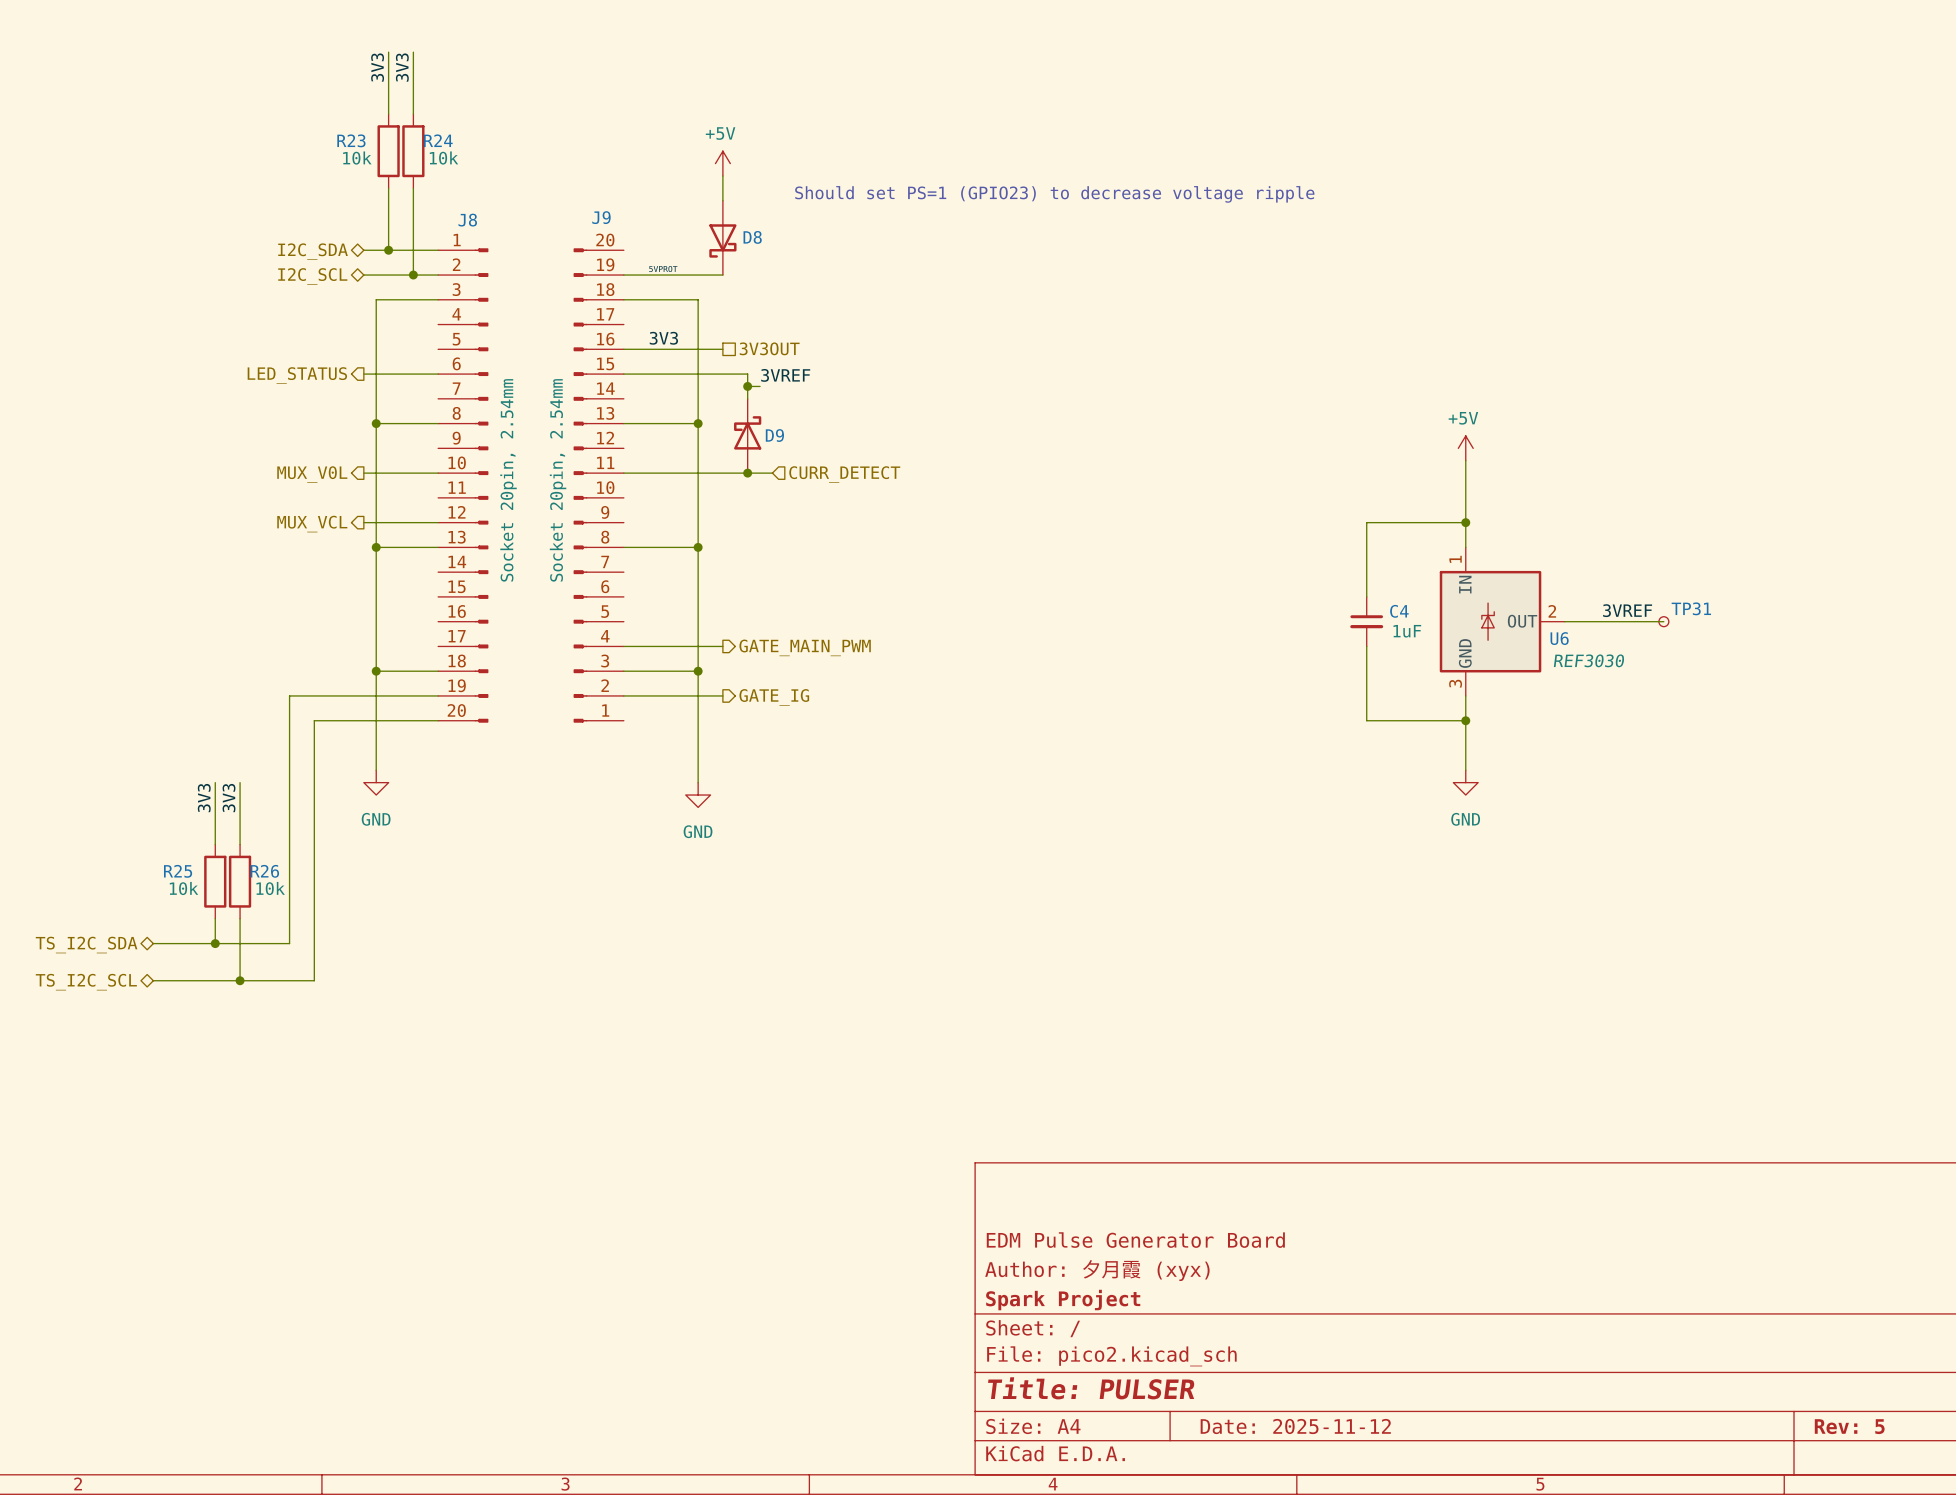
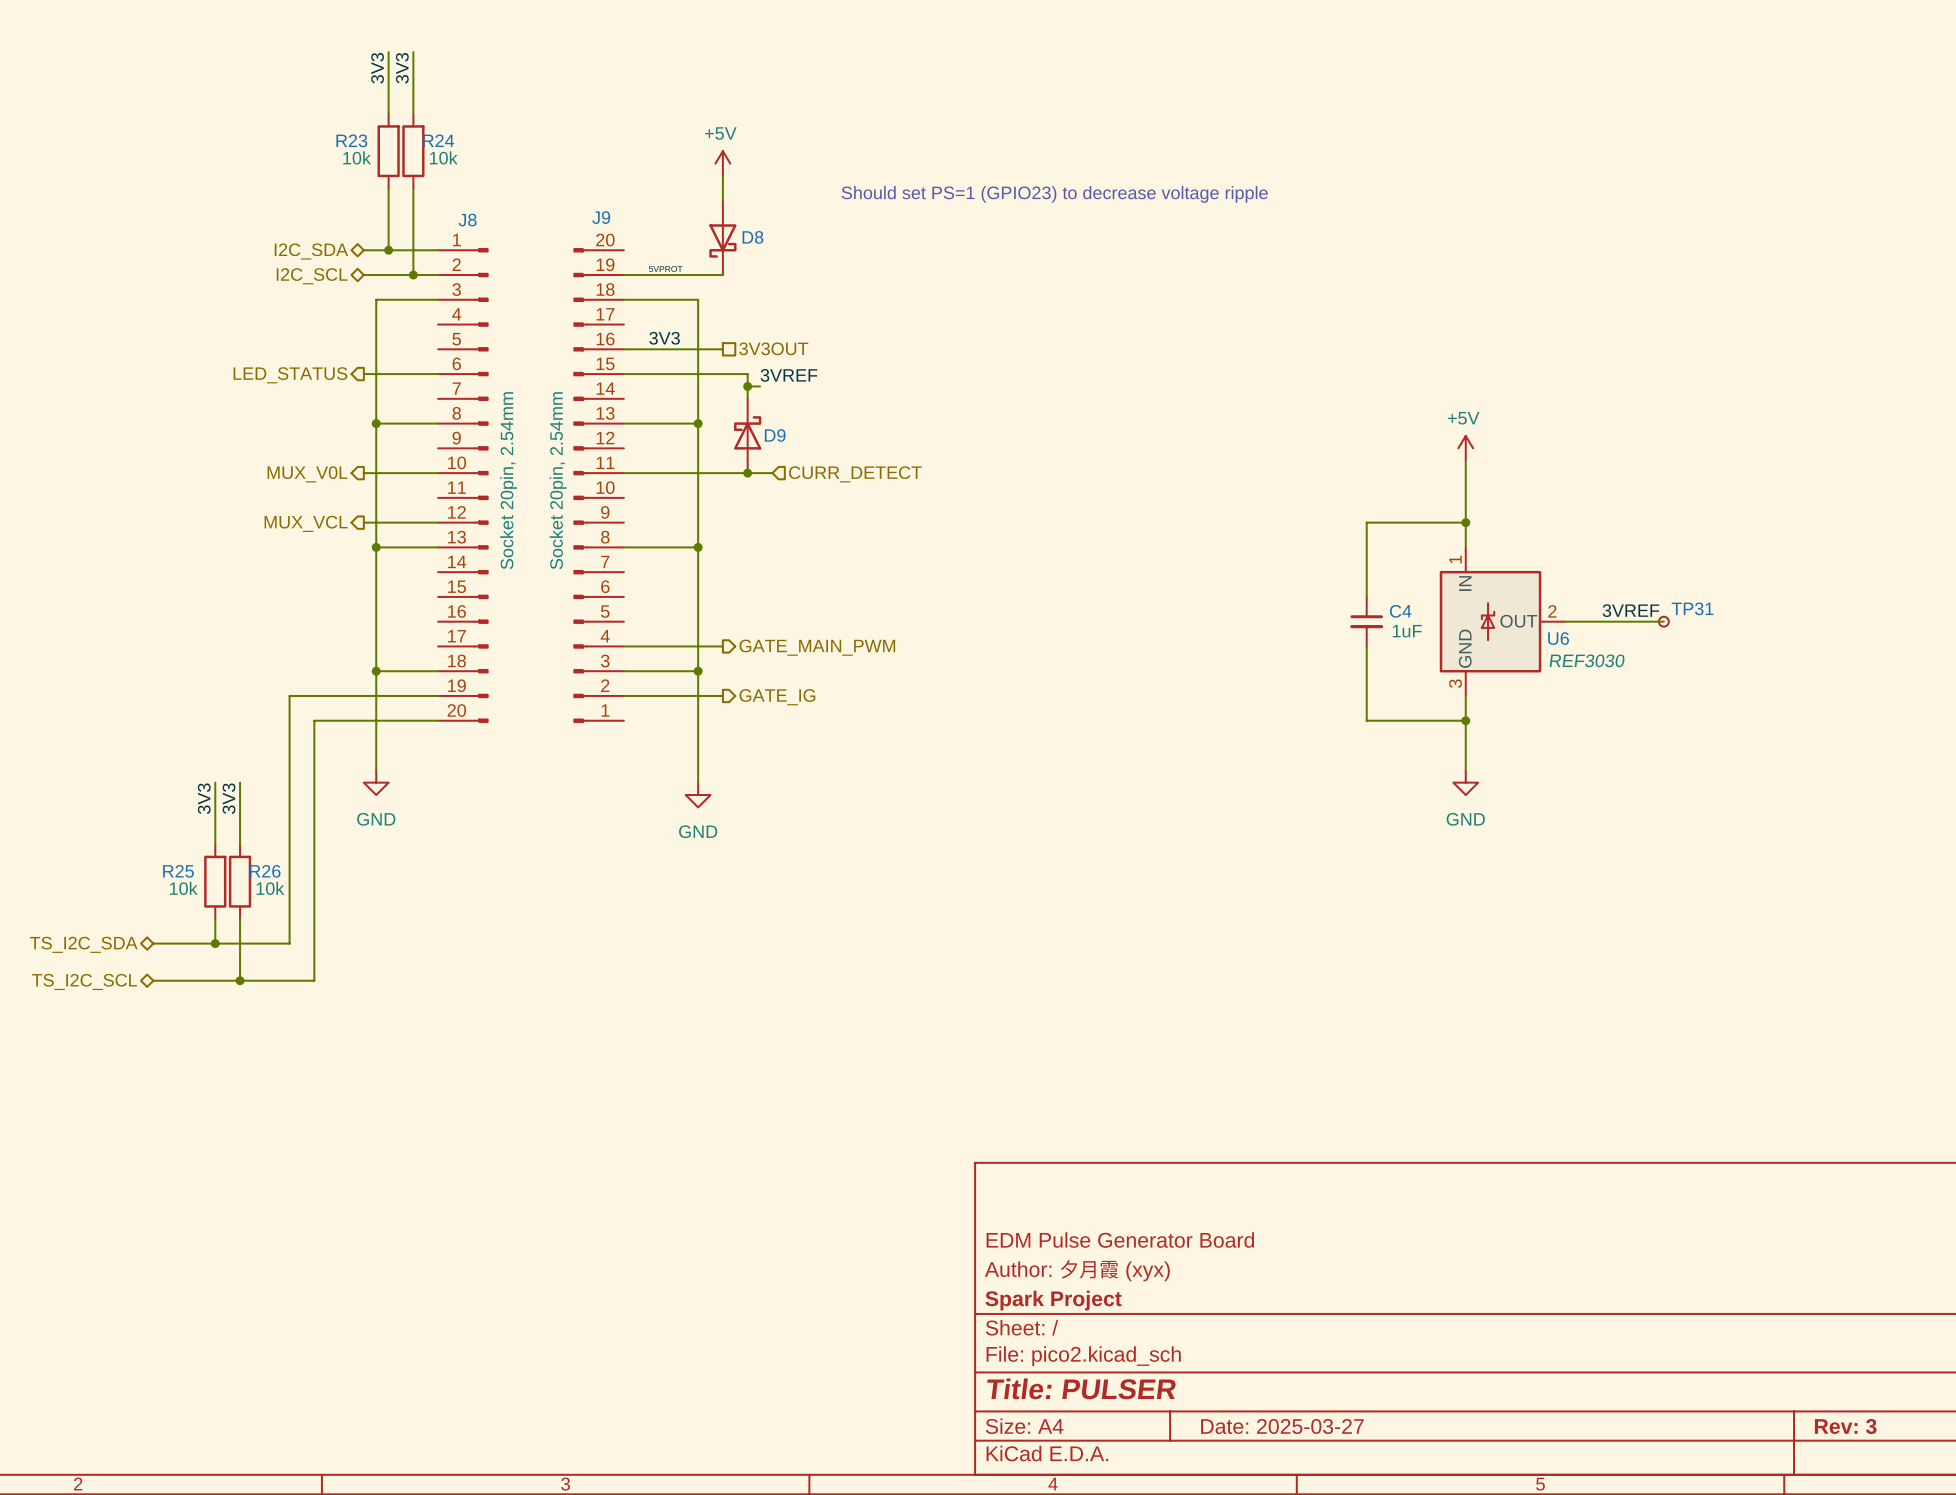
title block: Date: 2025-11-12 (1295, 1426) -> Date: 2025-03-27 (1282, 1426)
title block: Rev: 5 (1849, 1426) -> Rev: 3 (1845, 1426)

